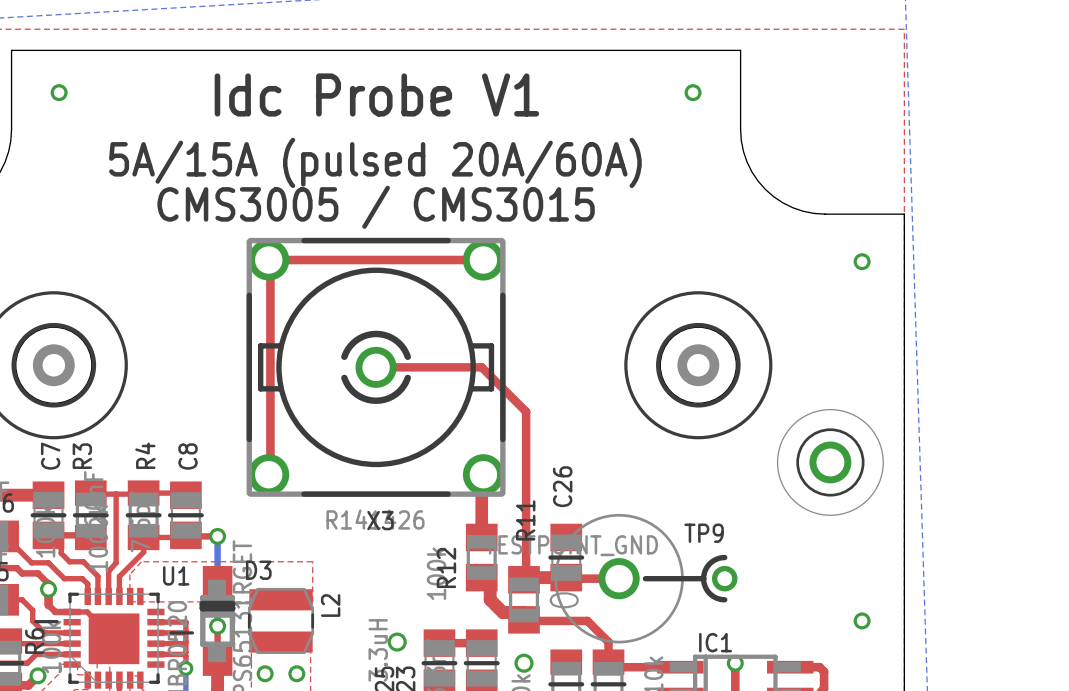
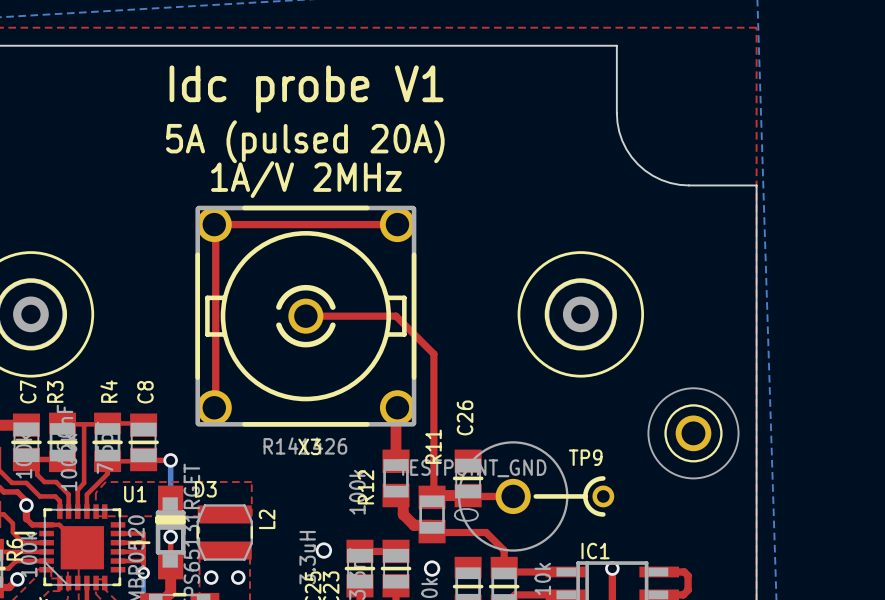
via: (59, 92) -> none
via: (693, 92) -> none
text: Idc Probe V1 (376, 94) -> Idc probe V1 (306, 89)
text: 5A/15A (pulsed 20A/60A) (375, 162) -> 5A (pulsed 20A) (305, 141)
text: CMS3005 / CMS3015 (376, 207) -> 1A/V 2MHz (306, 179)
via: (862, 261) -> none
part position: (830, 462) -> (693, 433)
via: (862, 620) -> none

